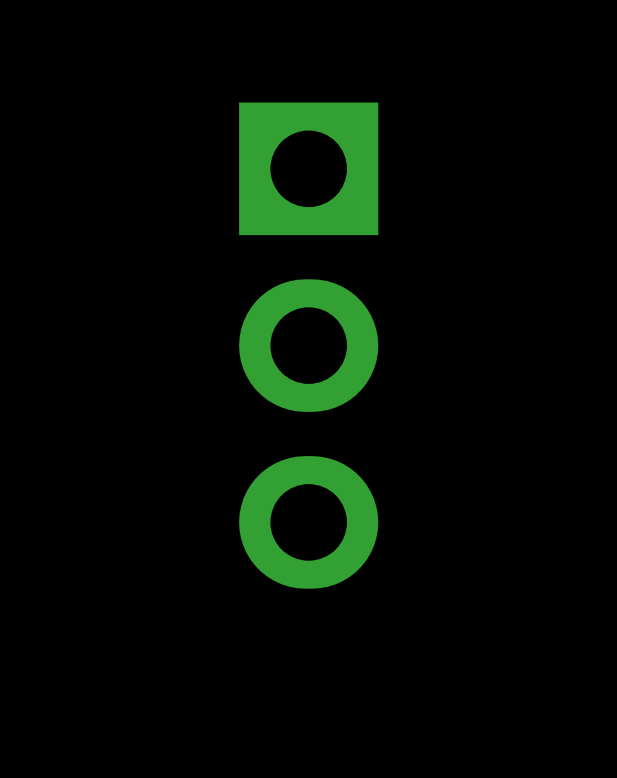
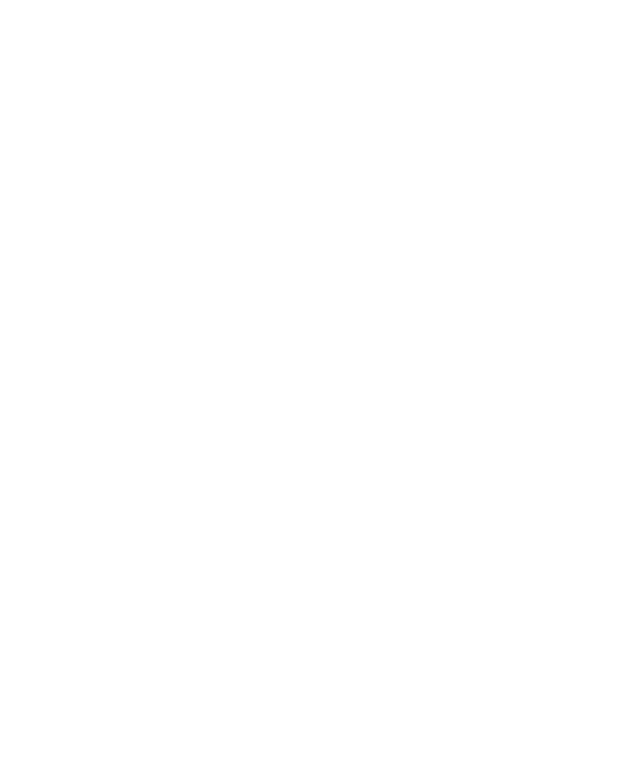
part: (308, 345) -> none

